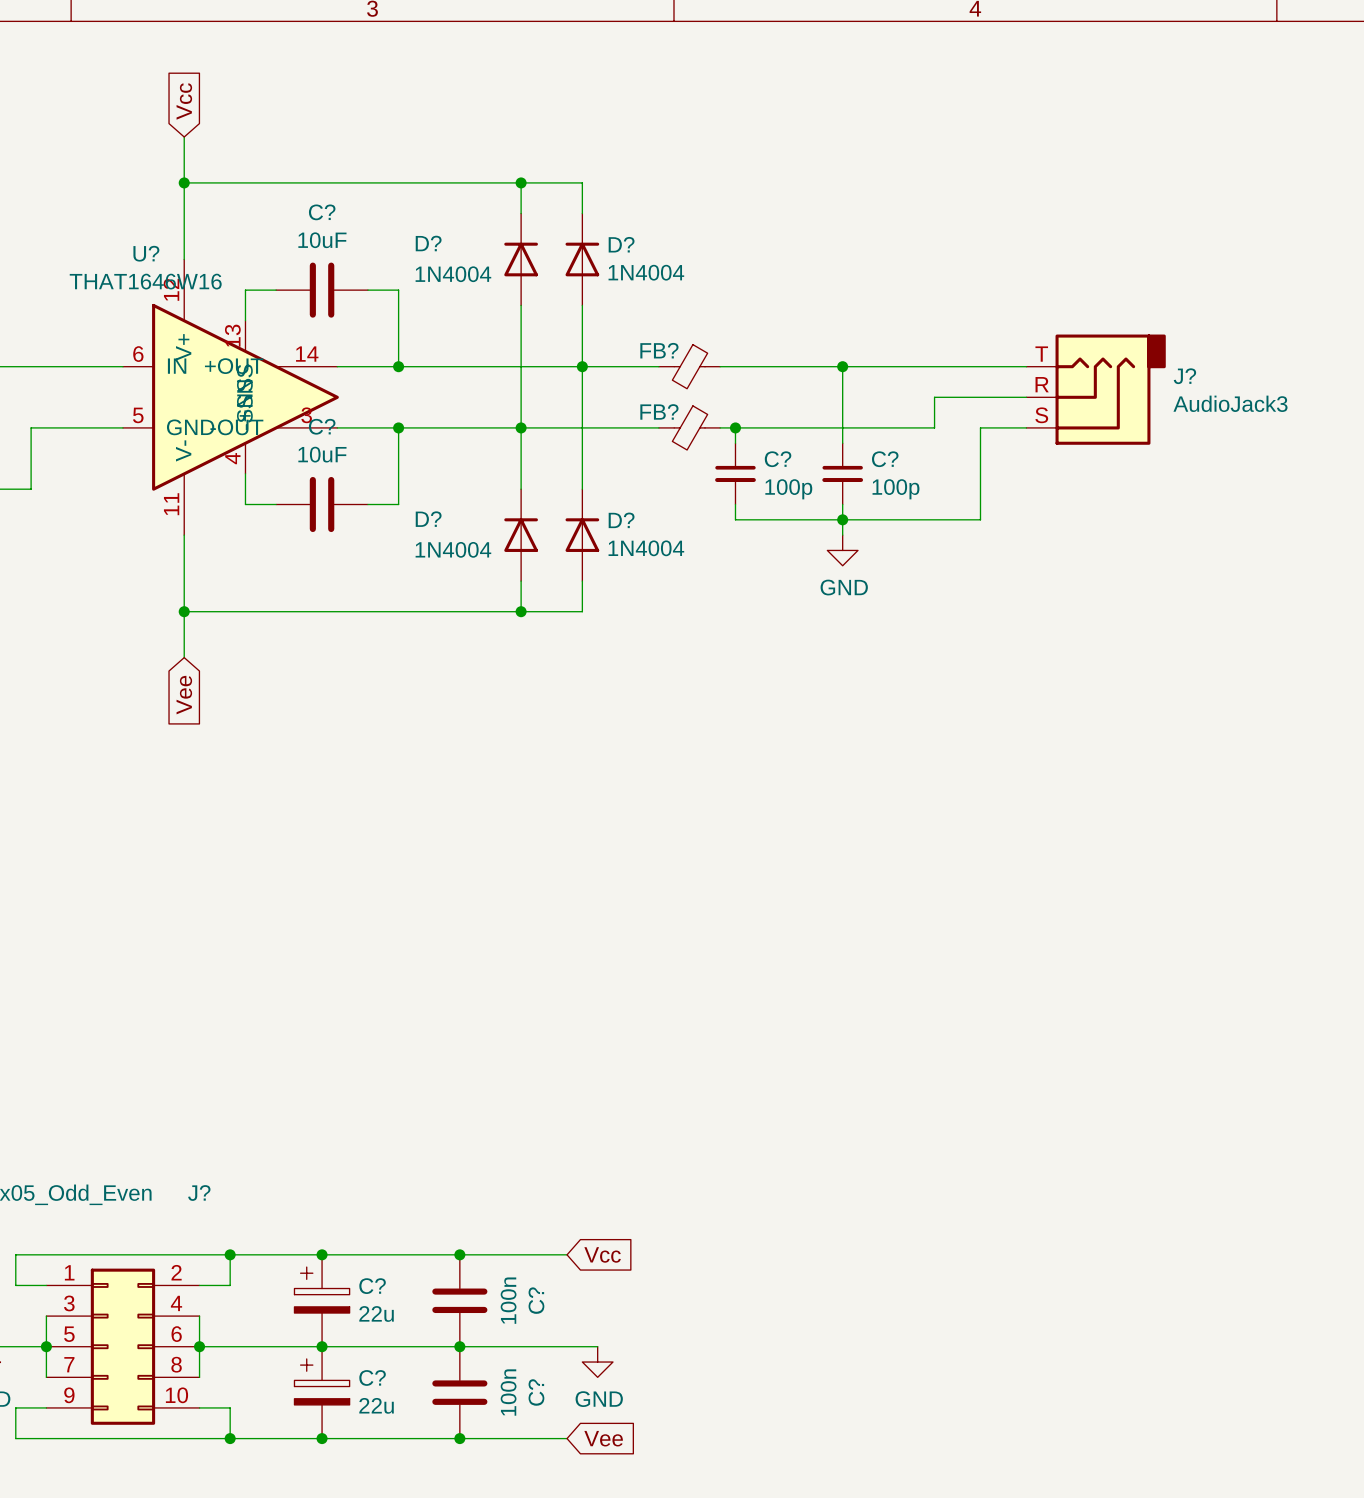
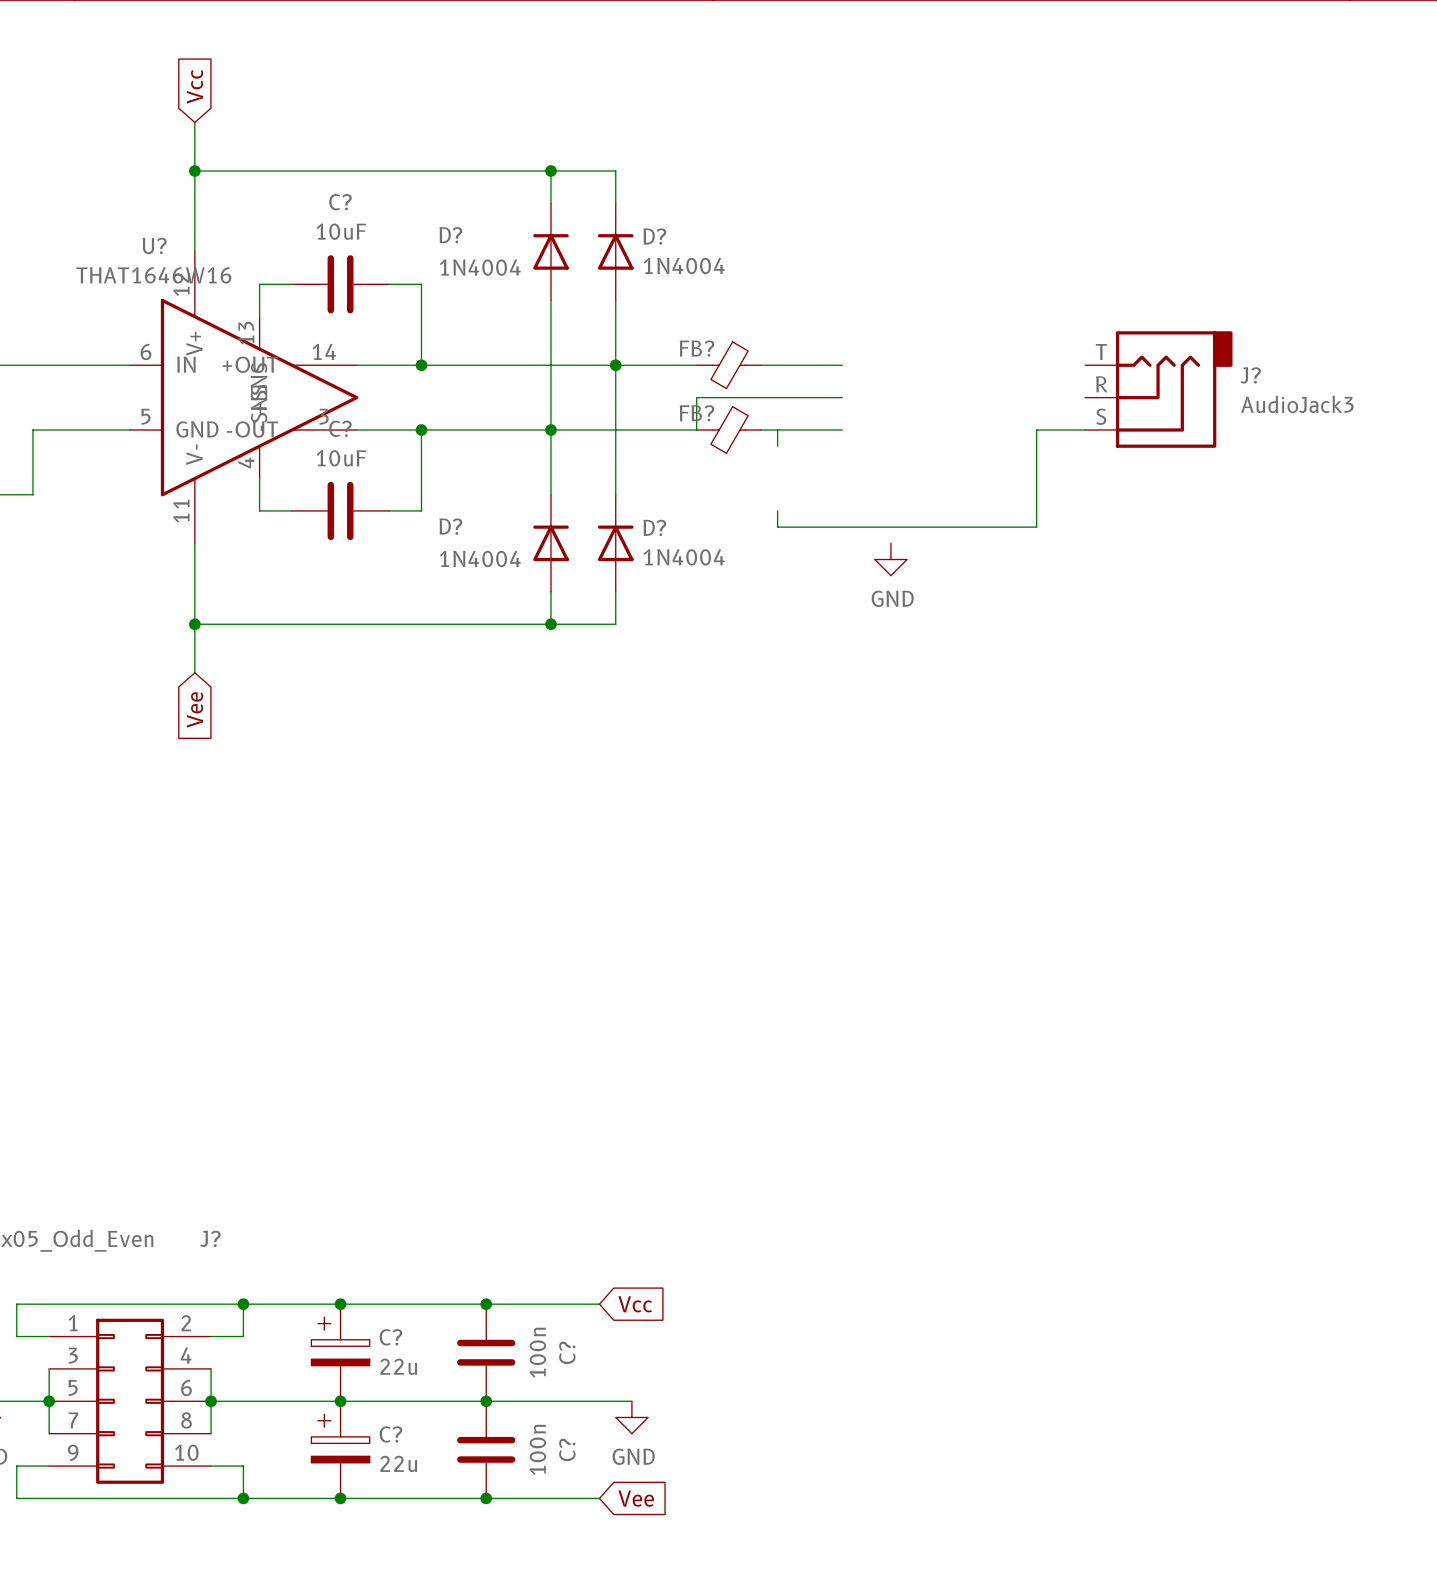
wire: (796, 366) (1026, 366) -> none
wire: (842, 366) (842, 443) -> none
junction: (842, 366) -> none
wire: none -> (842, 397) (696, 397) (696, 430)
wire: (1026, 397) (934, 397) (934, 427) (796, 427) -> none
junction: (735, 427) -> none
C?: 100p (735, 473) -> none
C?: 100p (842, 473) -> none
wire: (842, 504) (842, 535) -> none
junction: (842, 519) -> none

